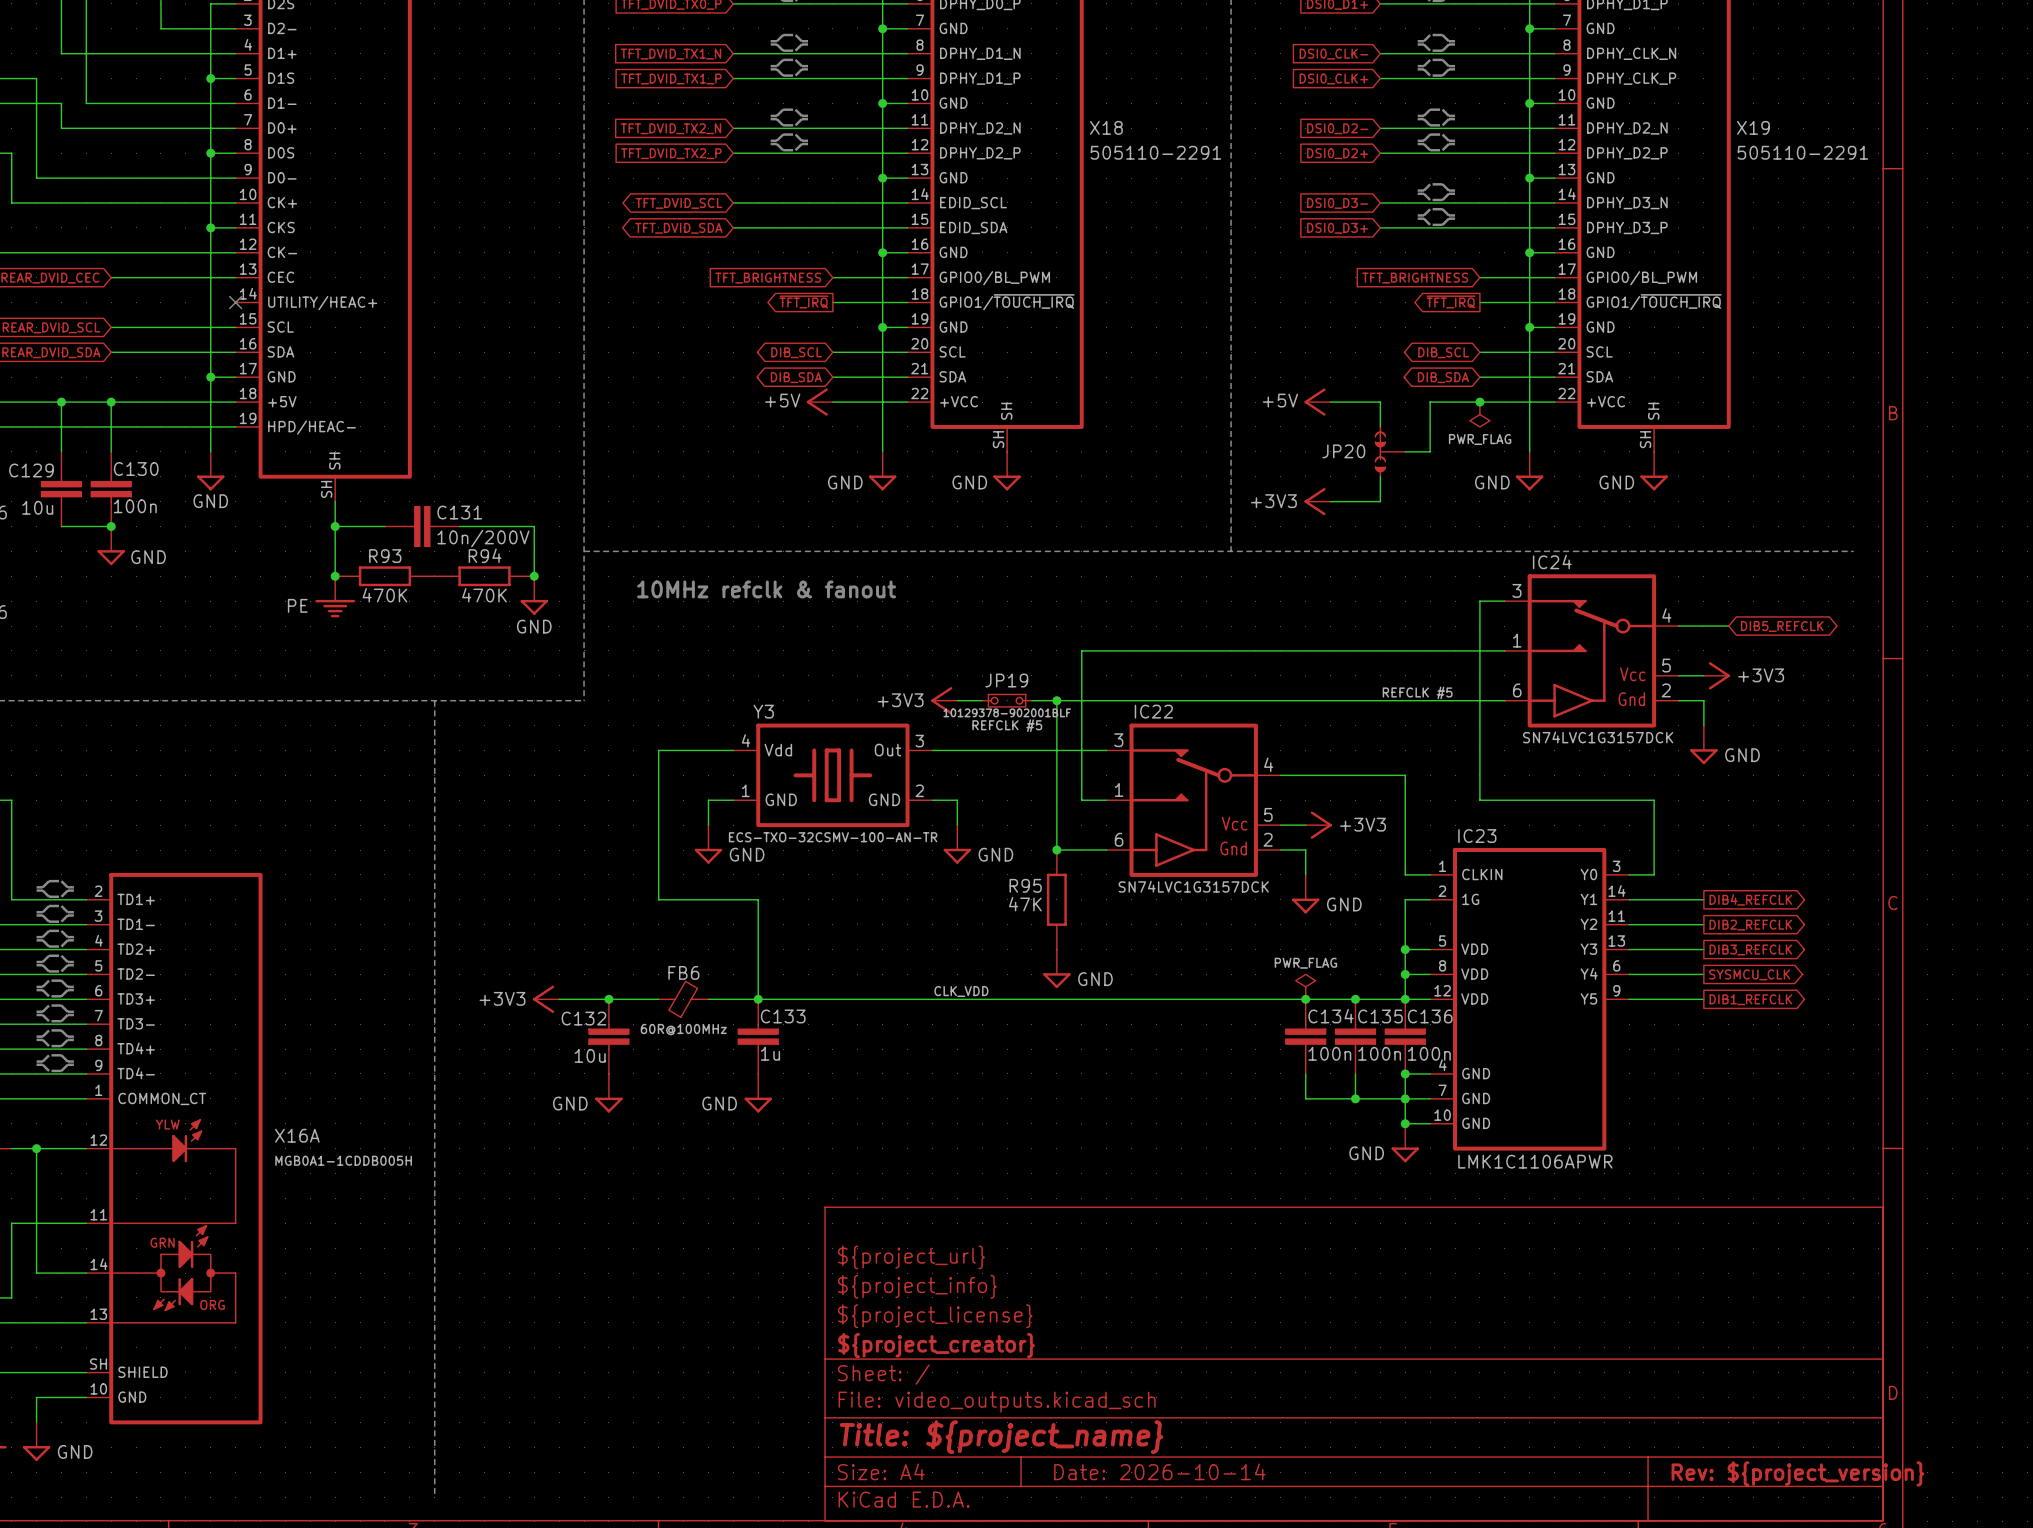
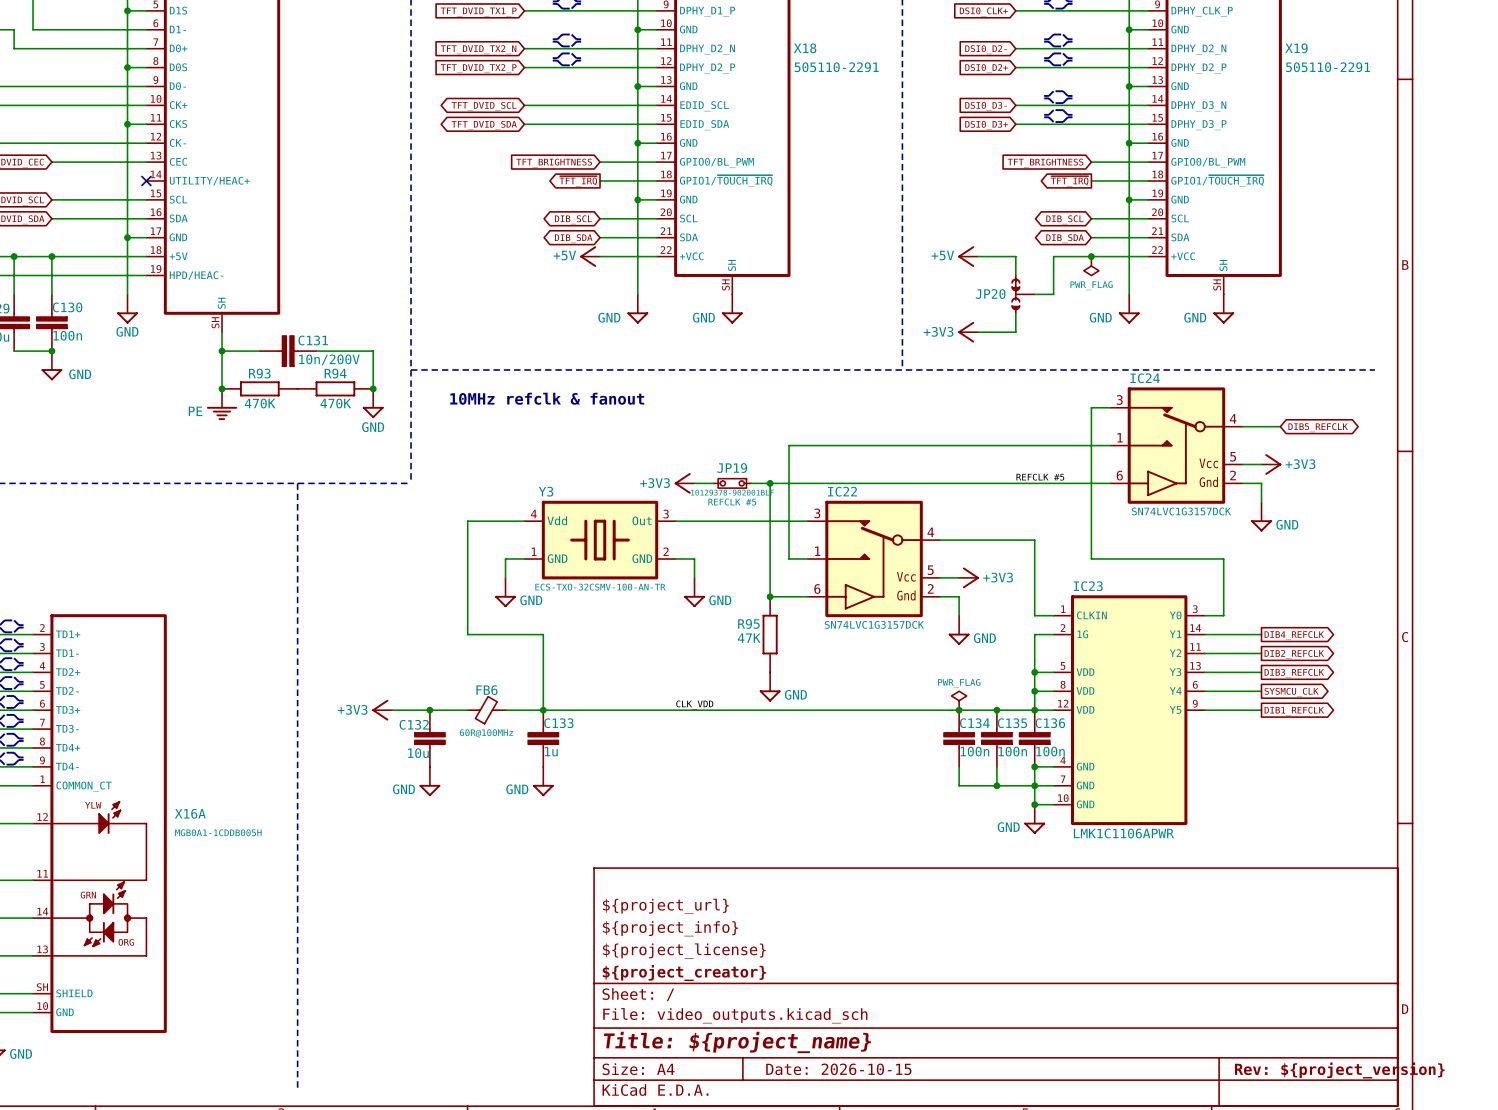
title block: Date: 2026-10-14 (1159, 1471) -> Date: 2026-10-15 (838, 1069)

